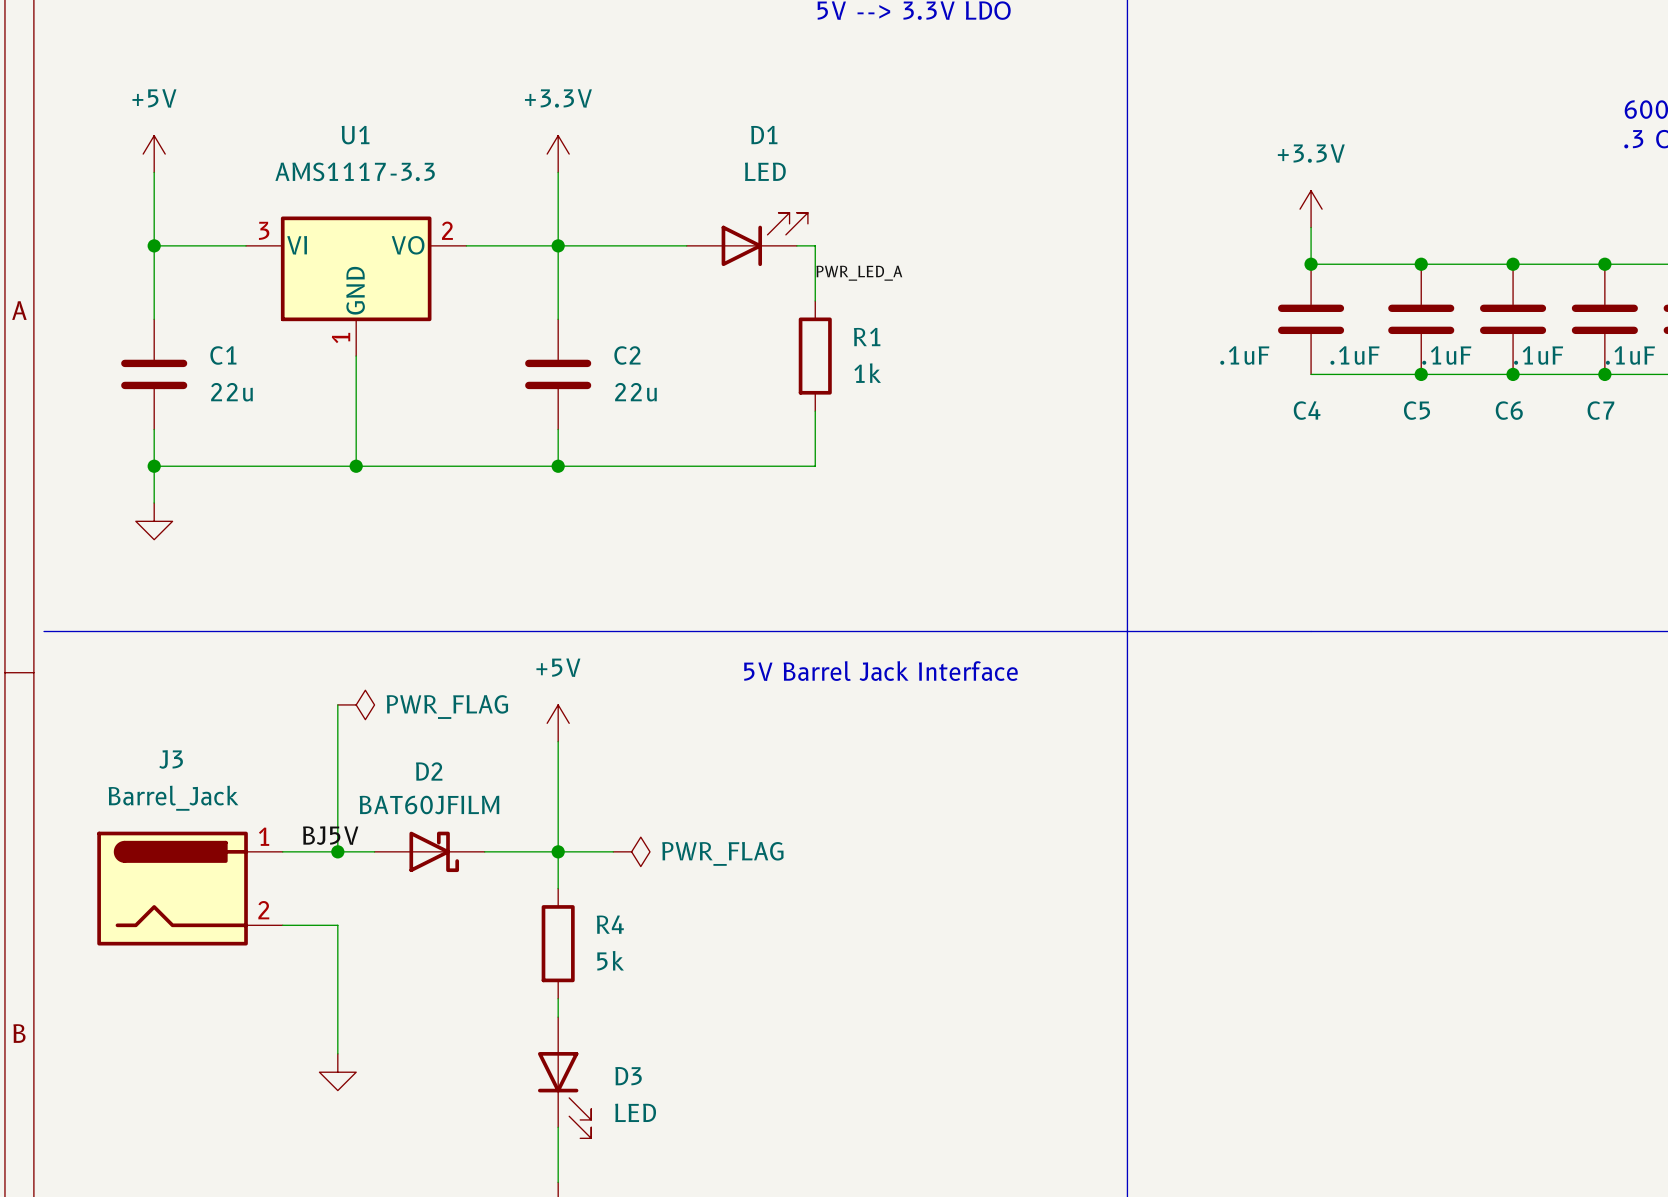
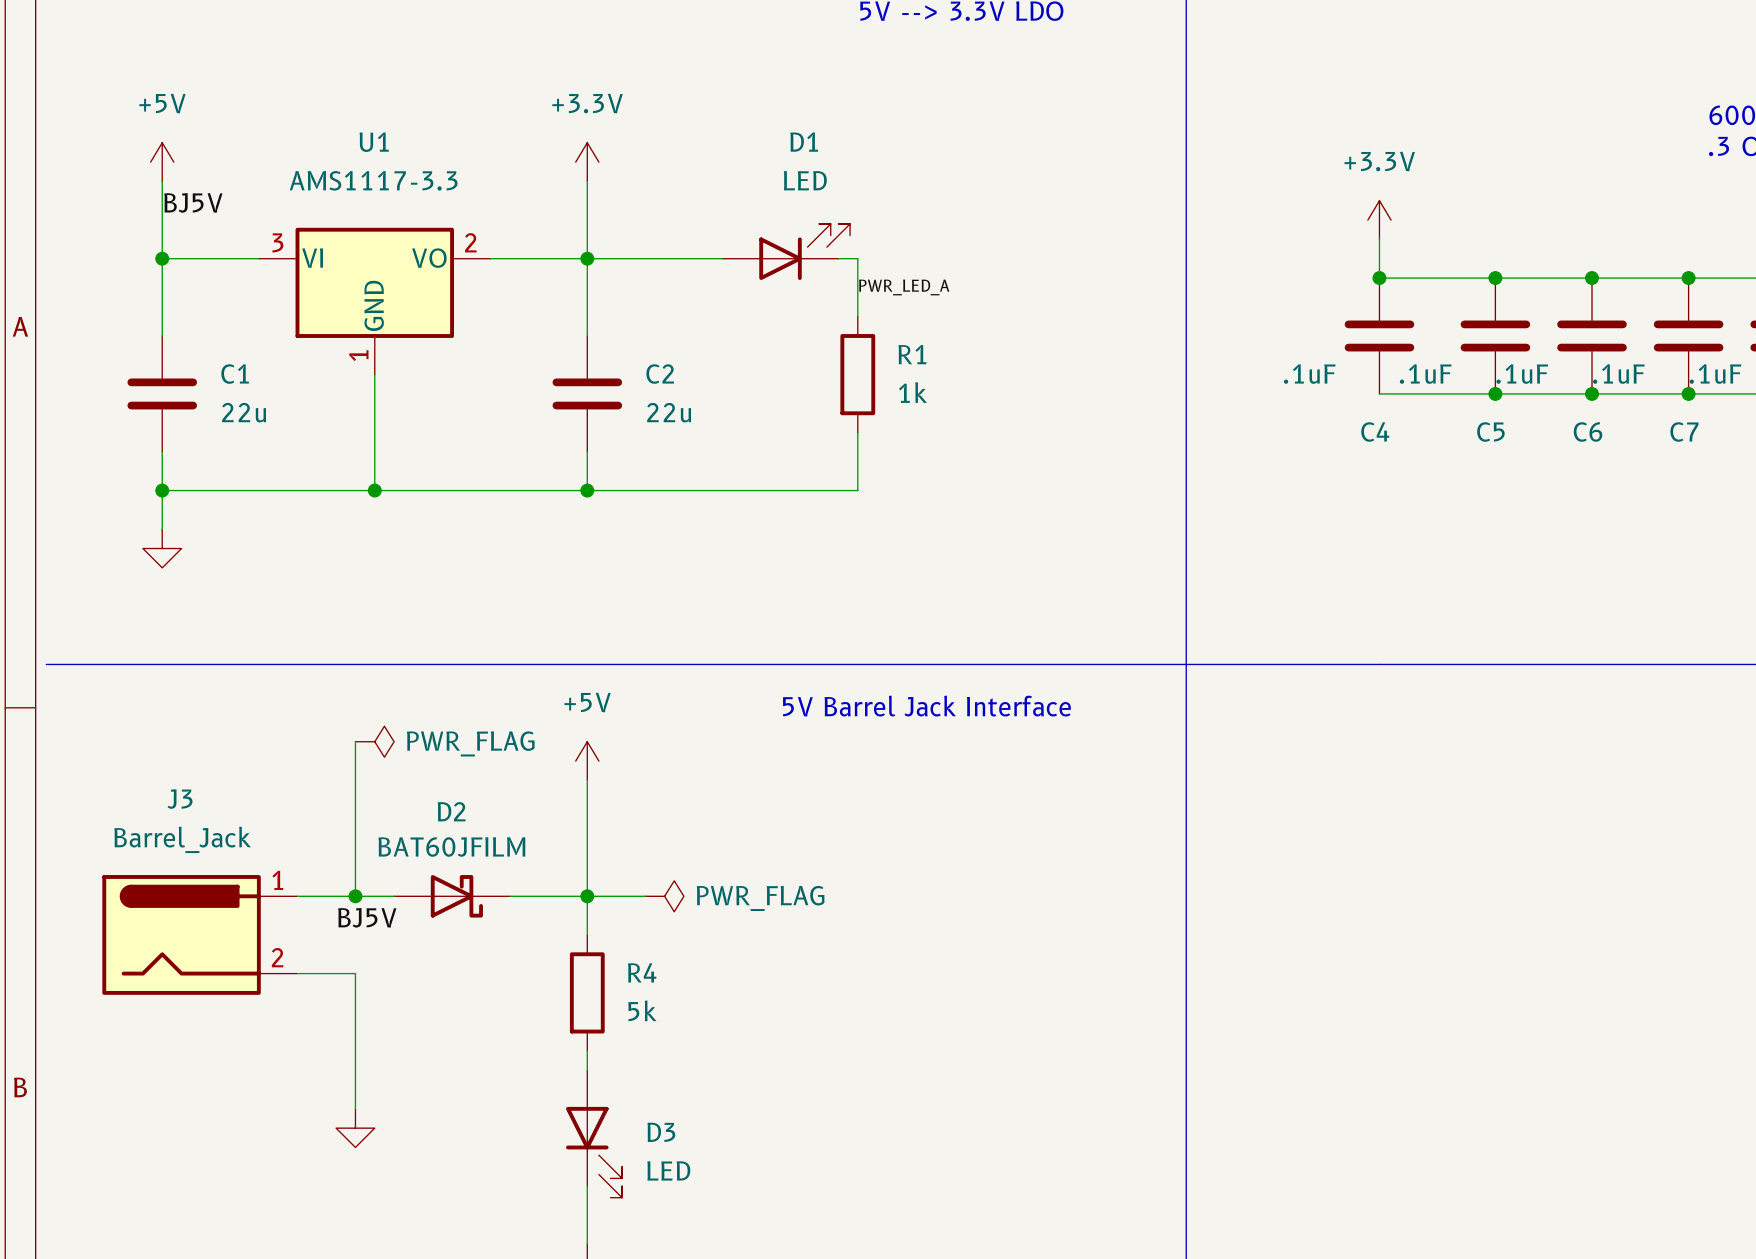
label: none -> BJ5V (193, 202)
label position: BJ5V (330, 835) -> BJ5V (367, 917)

